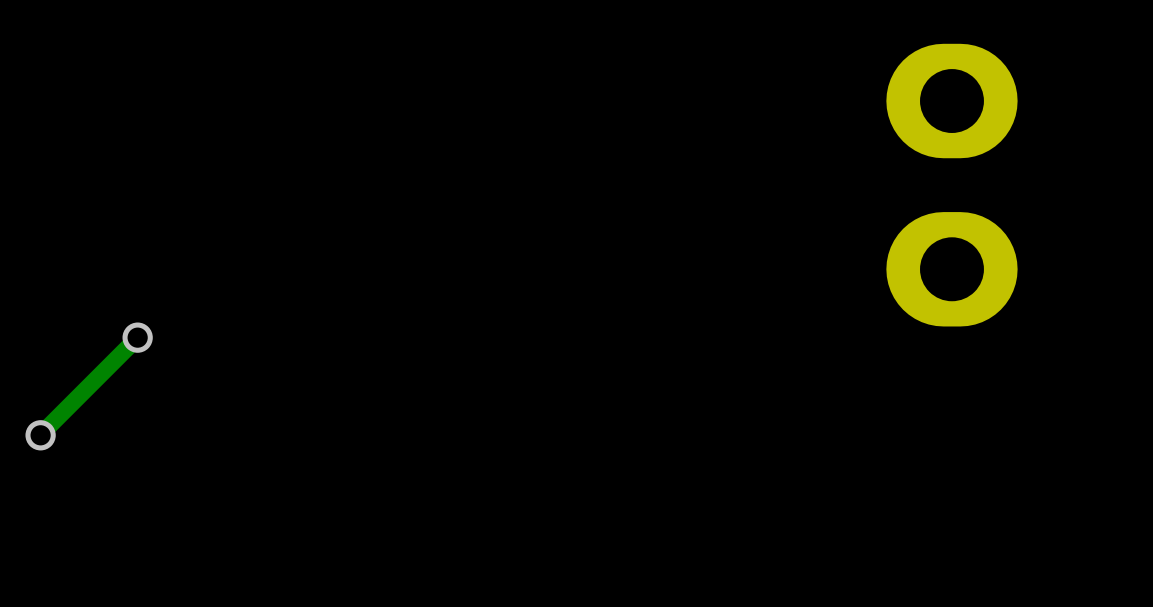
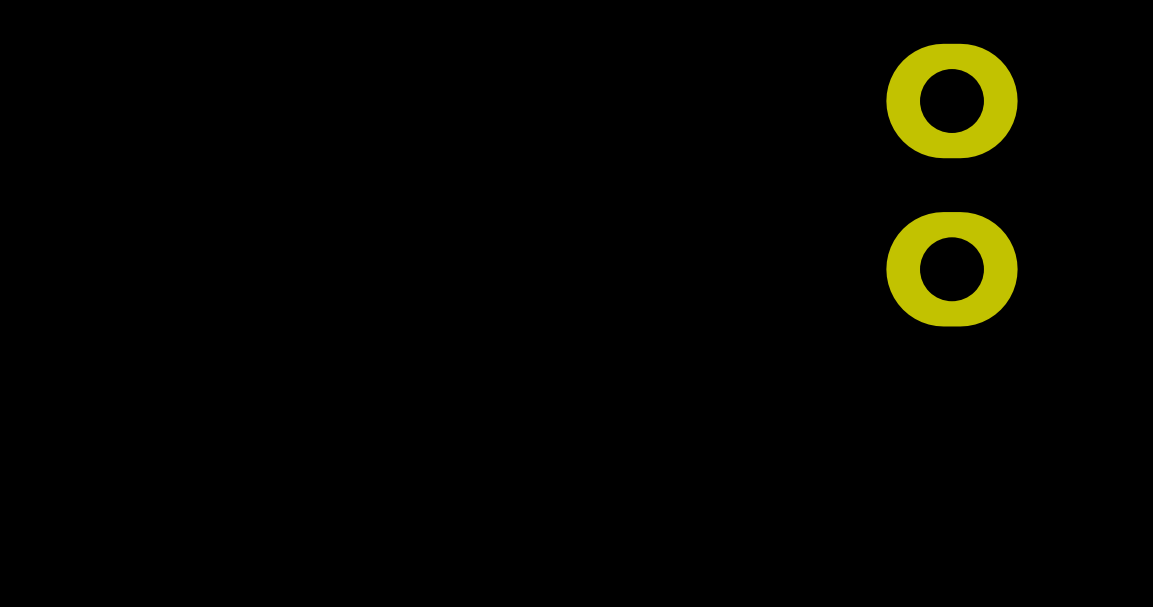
track: (137, 337) (40, 434) -> none
via: (137, 337) -> none
via: (40, 435) -> none

